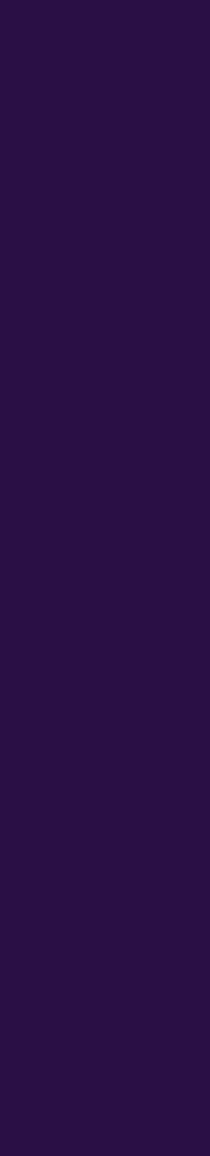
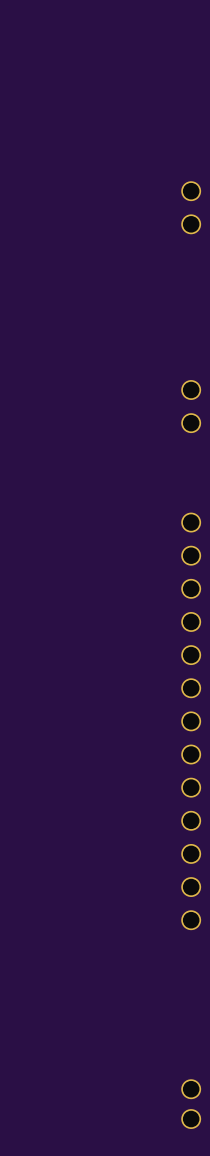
part: none -> (191, 191)
part: none -> (191, 224)
part: none -> (191, 390)
part: none -> (191, 423)
part: none -> (191, 522)
part: none -> (191, 555)
part: none -> (191, 588)
part: none -> (191, 621)
part: none -> (191, 655)
part: none -> (191, 688)
part: none -> (191, 721)
part: none -> (191, 754)
part: none -> (191, 787)
part: none -> (191, 820)
part: none -> (191, 853)
part: none -> (191, 887)
part: none -> (191, 920)
part: none -> (191, 1089)
part: none -> (191, 1119)

